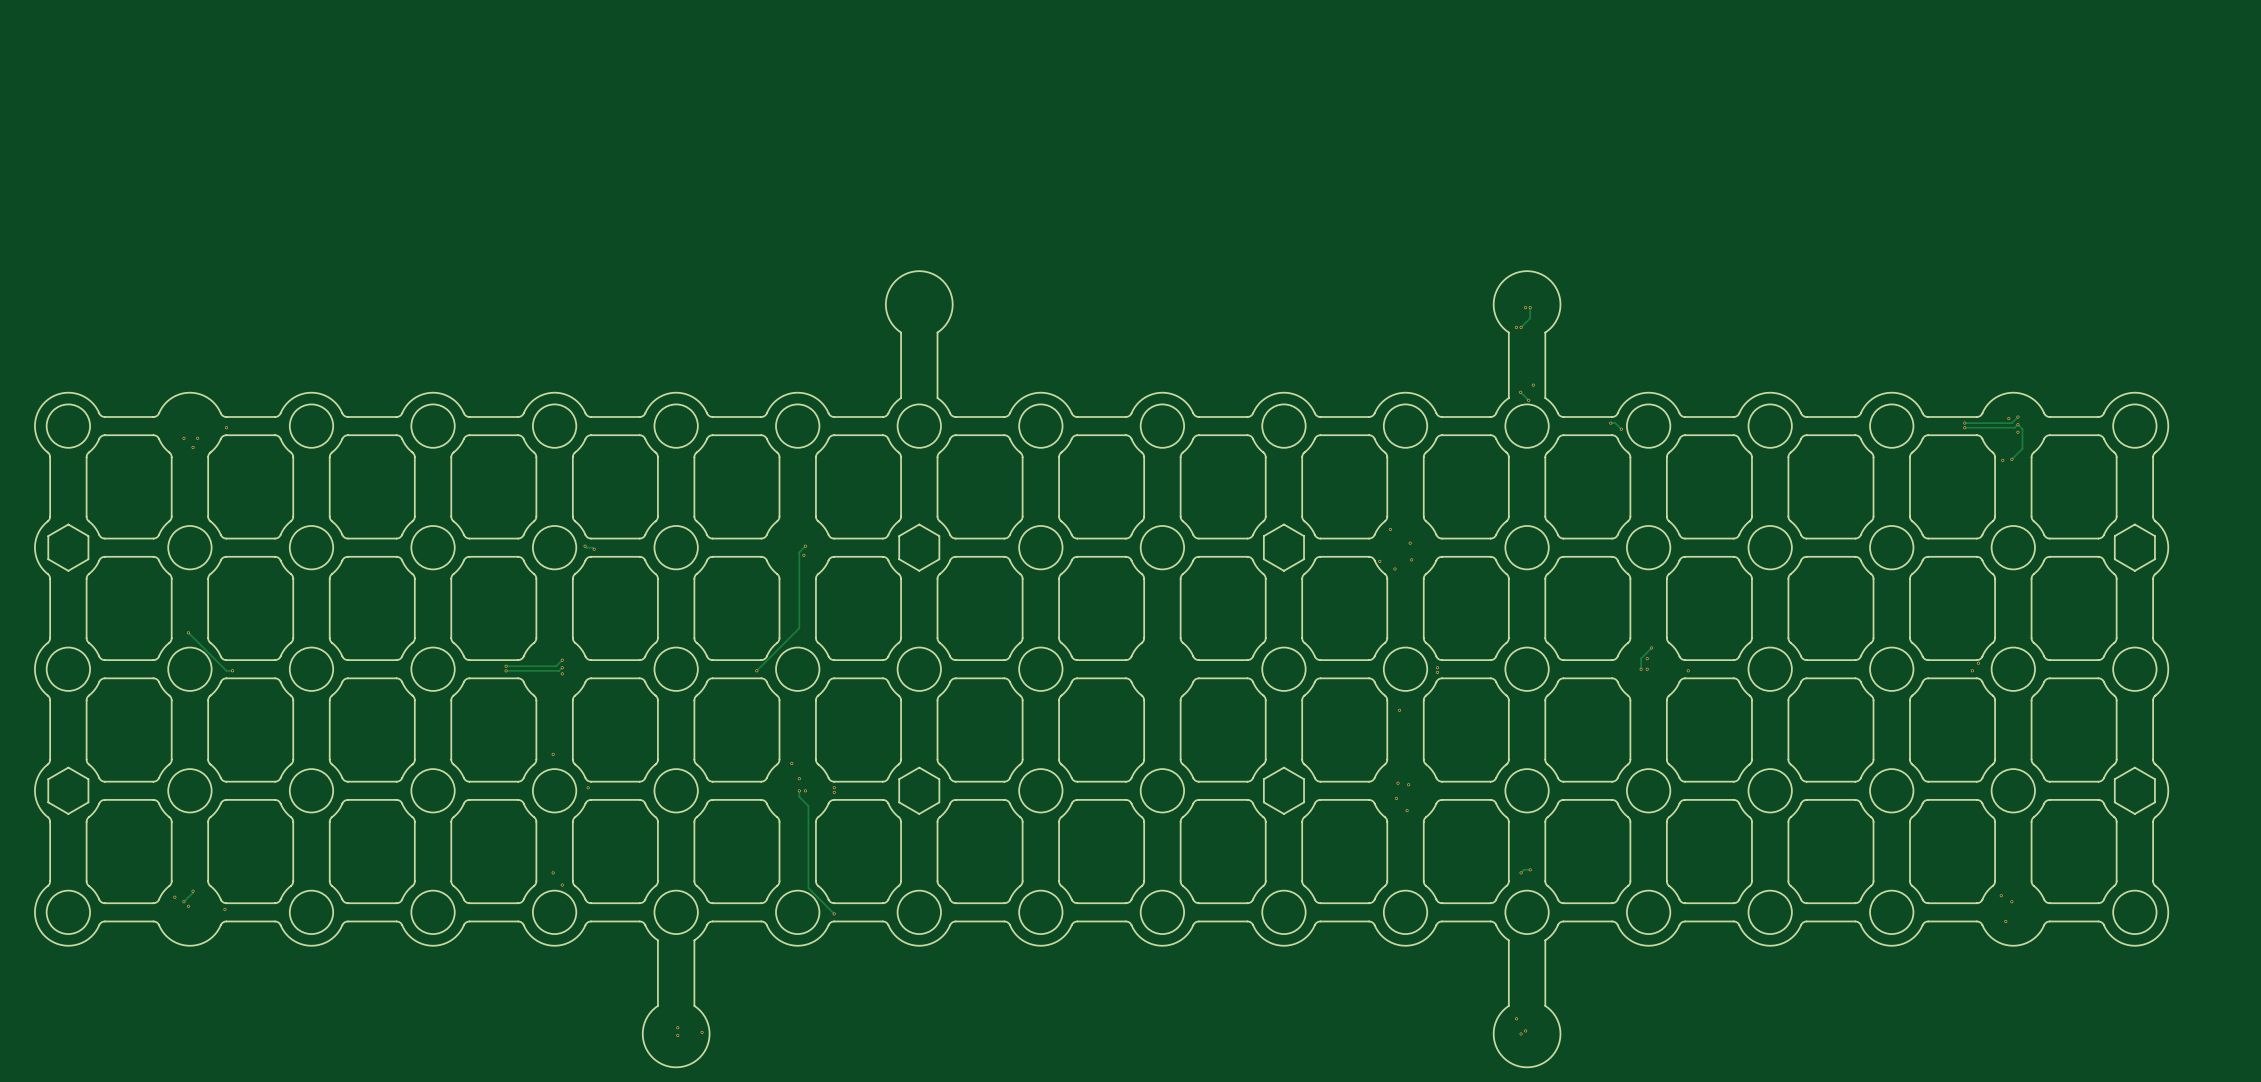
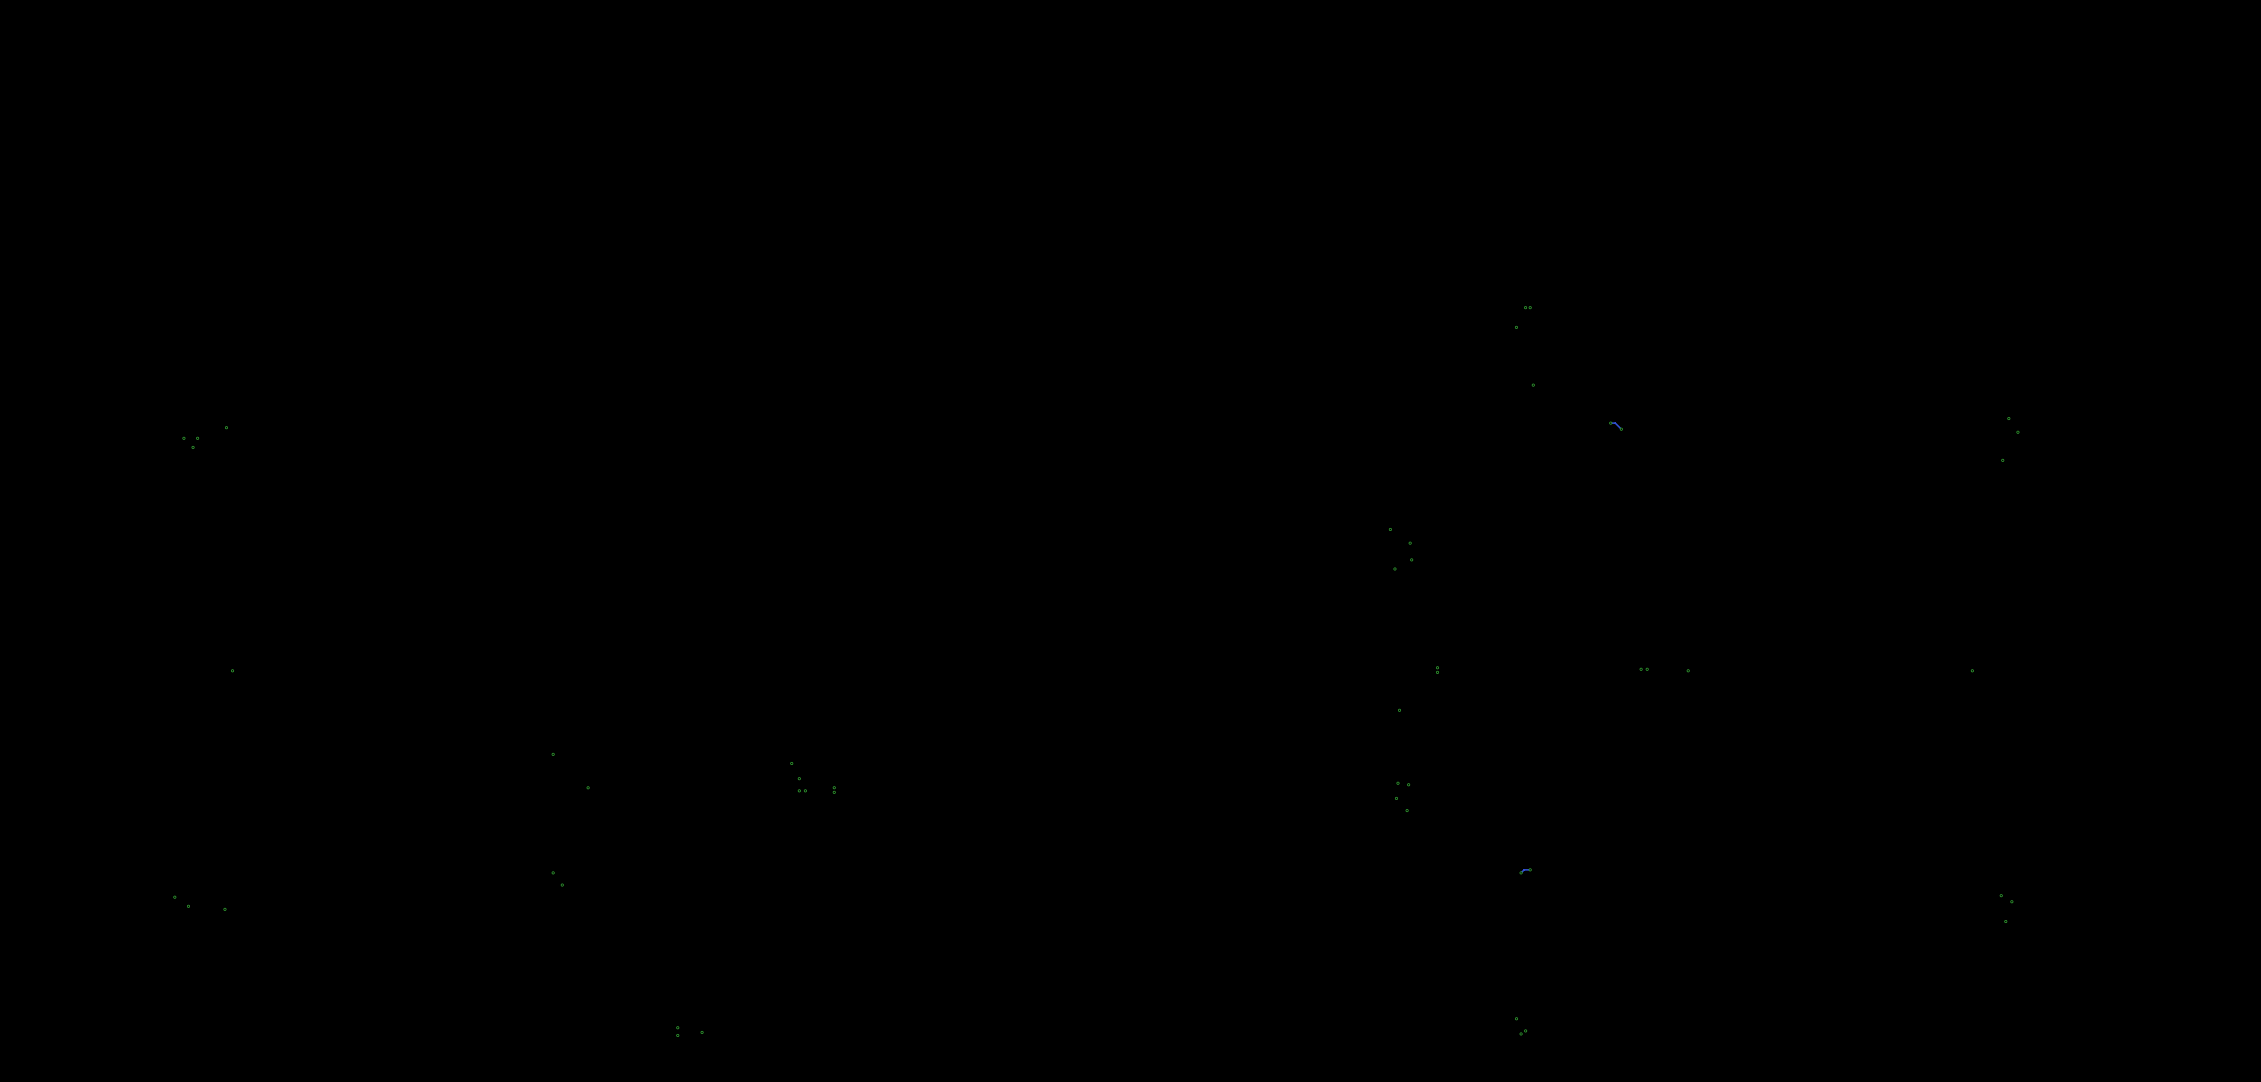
track: (1530, 307) (1530, 318) (1521, 327) -> none
via: (1521, 327) -> none
board edge: (1545, 332) (1545, 398) (1562, 416) (1613, 416) (1628, 399) (1638, 394) (1648, 392) (1659, 394) (1668, 399) (1680, 415) (1685, 416) (1735, 416) (1750, 399) (1759, 394) (1770, 392) (1780, 394) (1790, 399) (1802, 415) (1806, 416) (1856, 416) (1871, 399) (1881, 394) (1891, 392) (1902, 394) (1911, 399) (1923, 415) (1928, 416) (1978, 416) (1993, 399) (2009, 392) (2020, 393) (2030, 397) (2049, 416) (2099, 416) (2114, 399) (2131, 392) (2145, 394) (2157, 401) (2165, 413) (2168, 427) (2164, 441) (2153, 456) (2153, 517) (2164, 531) (2168, 547) (2164, 563) (2153, 578) (2153, 638) (2164, 653) (2168, 669) (2164, 685) (2153, 699) (2153, 759) (2164, 774) (2168, 790) (2164, 806) (2153, 821) (2153, 881) (2164, 896) (2168, 910) (2165, 924) (2157, 936) (2145, 943) (2131, 945) (2114, 939) (2099, 921) (2049, 921) (2030, 941) (2020, 945) (2009, 945) (1993, 939) (1978, 921) (1928, 921) (1923, 923) (1911, 939) (1902, 944) (1891, 945) (1881, 944) (1871, 939) (1856, 921) (1806, 921) (1802, 923) (1790, 939) (1780, 944) (1770, 945) (1759, 944) (1750, 939) (1735, 921) (1685, 921) (1680, 923) (1668, 939) (1659, 944) (1648, 945) (1638, 944) (1628, 939) (1613, 921) (1562, 921) (1545, 940) (1545, 1005) (1557, 1019) (1560, 1030) (1559, 1041) (1555, 1051) (1547, 1060) (1538, 1065) (1527, 1067) (1516, 1065) (1506, 1060) (1498, 1051) (1494, 1041) (1493, 1030) (1496, 1019) (1508, 1005) (1508, 940) (1492, 921) (1440, 921) (1425, 939) (1416, 944) (1405, 945) (1394, 944) (1385, 939) (1370, 921) (1319, 921) (1315, 923) (1303, 939) (1294, 944) (1283, 945) (1273, 944) (1263, 939) (1248, 921) (1198, 921) (1194, 923) (1182, 939) (1172, 944) (1162, 945) (1151, 944) (1142, 939) (1127, 921) (1077, 921) (1072, 923) (1060, 939) (1051, 944) (1040, 945) (1030, 944) (1020, 939) (1005, 921) (955, 921) (951, 923) (939, 939) (929, 944) (919, 945) (908, 944) (899, 939) (884, 921) (834, 921) (829, 923) (817, 939) (808, 944) (797, 945) (787, 944) (777, 939) (762, 921) (711, 921) (694, 940) (694, 1005) (706, 1019) (709, 1030) (708, 1041) (704, 1051) (696, 1060) (687, 1065) (676, 1067) (665, 1065) (655, 1060) (647, 1051) (643, 1041) (642, 1030) (645, 1019) (657, 1005) (657, 940) (641, 921) (589, 921) (574, 939) (565, 944) (554, 945) (544, 944) (534, 939) (522, 923) (518, 921) (468, 921) (453, 939) (443, 944) (433, 945) (422, 944) (413, 939) (401, 923) (396, 921) (346, 921) (331, 939) (322, 944) (311, 945) (300, 944) (291, 939) (279, 923) (275, 921) (224, 921) (209, 939) (200, 944) (189, 945) (179, 944) (169, 939) (157, 923) (154, 921) (103, 921) (88, 939) (78, 944) (68, 945) (51, 940) (42, 934) (37, 924) (34, 914) (36, 903) (40, 893) (50, 881) (50, 821) (39, 806) (34, 790) (39, 774) (50, 760) (50, 700) (39, 685) (34, 669) (39, 653) (50, 638) (50, 578) (39, 563) (34, 547) (39, 531) (50, 517) (50, 457) (38, 441) (34, 424) (40, 407) (48, 399) (57, 394) (71, 392) (82, 395) (91, 401) (100, 415) (104, 416) (154, 416) (169, 399) (179, 394) (189, 392) (200, 394) (209, 399) (221, 415) (225, 416) (276, 416) (291, 399) (300, 394) (311, 392) (322, 394) (331, 399) (346, 416) (397, 416) (401, 415) (413, 399) (422, 394) (433, 392) (443, 394) (453, 399) (468, 416) (518, 416) (522, 415) (534, 399) (544, 394) (554, 392) (565, 394) (574, 399) (589, 416) (639, 416) (644, 415) (656, 399) (665, 394) (676, 392) (686, 394) (696, 399) (711, 416) (761, 416) (765, 415) (777, 399) (787, 394) (797, 392) (808, 394) (817, 399) (832, 416) (883, 416) (901, 398) (901, 332) (892, 325) (887, 315) (886, 296) (891, 286) (898, 278) (908, 272) (919, 271) (930, 272) (940, 278) (947, 286) (951, 296) (950, 315) (945, 325) (937, 332) (937, 398) (955, 416) (1005, 416) (1020, 399) (1030, 394) (1040, 392) (1051, 394) (1060, 399) (1075, 416) (1126, 416) (1130, 415) (1142, 399) (1151, 394) (1162, 392) (1172, 394) (1182, 399) (1197, 416) (1248, 416) (1251, 415) (1263, 399) (1273, 394) (1283, 392) (1294, 394) (1303, 399) (1319, 416) (1369, 416) (1373, 415) (1385, 399) (1394, 394) (1405, 392) (1416, 394) (1425, 399) (1440, 416) (1491, 416) (1508, 398) (1508, 332) (1496, 318) (1493, 304) (1497, 289) (1509, 276) (1519, 271) (1534, 271) (1547, 278) (1555, 286) (1559, 296) (1559, 311) (1555, 321) (1545, 332) -> none
track: (1520, 392) (1528, 400) -> none
via: (1520, 392) -> none
via: (1528, 400) -> none
round board edge: [46, 404, 91, 448] -> none
round board edge: [289, 404, 334, 448] -> none
round board edge: [411, 404, 455, 448] -> none
round board edge: [532, 404, 577, 448] -> none
round board edge: [654, 404, 699, 448] -> none
round board edge: [775, 404, 820, 448] -> none
round board edge: [897, 404, 942, 448] -> none
round board edge: [1018, 404, 1063, 448] -> none
round board edge: [1140, 404, 1185, 448] -> none
round board edge: [1262, 404, 1306, 448] -> none
round board edge: [1383, 404, 1428, 448] -> none
round board edge: [1505, 404, 1549, 448] -> none
round board edge: [1626, 404, 1671, 448] -> none
round board edge: [1748, 404, 1793, 448] -> none
round board edge: [1869, 404, 1914, 448] -> none
round board edge: [2113, 404, 2157, 448] -> none
track: (2017, 417) (2011, 423) (1964, 423) -> none
via: (2017, 417) -> none
via: (1964, 423) -> none
via: (2017, 424) -> none
track: (1964, 427) (2014, 427) (2017, 424) (2022, 429) (2022, 448) (2011, 459) -> none
via: (1964, 427) -> none
board edge: (153, 435) (103, 435) (87, 454) (86, 517) (102, 537) (154, 538) (171, 519) (171, 455) (157, 437) (153, 435) -> none
board edge: (275, 435) (224, 435) (208, 454) (208, 517) (223, 537) (276, 538) (292, 519) (293, 455) (279, 437) (275, 435) -> none
board edge: (396, 435) (346, 435) (330, 454) (329, 517) (345, 537) (397, 538) (414, 519) (414, 455) (401, 437) (396, 435) -> none
board edge: (518, 435) (468, 435) (451, 454) (451, 517) (466, 537) (519, 538) (535, 519) (536, 455) (522, 437) (518, 435) -> none
board edge: (639, 435) (589, 435) (573, 454) (572, 517) (588, 537) (641, 538) (657, 519) (657, 455) (644, 437) (639, 435) -> none
board edge: (761, 435) (711, 435) (695, 454) (694, 517) (709, 537) (762, 538) (778, 519) (779, 455) (765, 437) (761, 435) -> none
board edge: (882, 435) (832, 435) (816, 454) (816, 517) (831, 537) (884, 538) (900, 519) (900, 455) (887, 437) (882, 435) -> none
board edge: (1004, 435) (954, 435) (938, 454) (937, 517) (952, 537) (1005, 538) (1021, 519) (1022, 455) (1008, 437) (1004, 435) -> none
board edge: (1125, 435) (1075, 435) (1059, 454) (1059, 517) (1074, 537) (1127, 538) (1143, 519) (1144, 455) (1130, 437) (1125, 435) -> none
board edge: (1247, 435) (1197, 435) (1181, 454) (1180, 517) (1196, 537) (1248, 538) (1265, 519) (1265, 455) (1251, 437) (1247, 435) -> none
board edge: (1369, 435) (1319, 435) (1302, 454) (1302, 517) (1317, 537) (1370, 538) (1386, 519) (1387, 455) (1373, 437) (1369, 435) -> none
board edge: (1490, 435) (1440, 435) (1424, 454) (1423, 517) (1439, 537) (1492, 538) (1508, 519) (1508, 455) (1495, 437) (1490, 435) -> none
board edge: (1612, 435) (1562, 435) (1545, 454) (1545, 517) (1560, 537) (1613, 538) (1629, 519) (1630, 455) (1616, 437) (1612, 435) -> none
board edge: (1733, 435) (1683, 435) (1667, 454) (1667, 517) (1682, 537) (1735, 538) (1751, 519) (1751, 455) (1738, 437) (1733, 435) -> none
board edge: (1855, 435) (1805, 435) (1789, 454) (1788, 517) (1803, 537) (1856, 538) (1872, 519) (1873, 455) (1859, 437) (1855, 435) -> none
board edge: (1976, 435) (1926, 435) (1910, 454) (1910, 517) (1925, 537) (1978, 538) (1994, 519) (1994, 455) (1981, 437) (1976, 435) -> none
board edge: (2098, 435) (2048, 435) (2032, 454) (2031, 517) (2047, 537) (2099, 538) (2116, 519) (2116, 455) (2102, 437) (2098, 435) -> none
via: (2011, 459) -> none
board edge: (68, 524) (88, 536) (88, 559) (68, 570) (48, 559) (48, 536) (68, 524) -> none
board edge: (919, 524) (899, 536) (899, 559) (919, 570) (939, 559) (939, 536) (919, 524) -> none
board edge: (1283, 524) (1304, 536) (1304, 559) (1283, 570) (1263, 559) (1263, 536) (1283, 524) -> none
board edge: (2134, 524) (2154, 536) (2154, 559) (2134, 570) (2114, 559) (2114, 536) (2134, 524) -> none
round board edge: [168, 525, 212, 570] -> none
round board edge: [289, 525, 334, 570] -> none
round board edge: [411, 525, 455, 570] -> none
round board edge: [532, 525, 577, 570] -> none
round board edge: [654, 525, 699, 570] -> none
round board edge: [1018, 525, 1063, 570] -> none
round board edge: [1140, 525, 1185, 570] -> none
round board edge: [1505, 525, 1549, 570] -> none
round board edge: [1626, 525, 1671, 570] -> none
round board edge: [1748, 525, 1793, 570] -> none
round board edge: [1869, 525, 1914, 570] -> none
round board edge: [1991, 525, 2036, 570] -> none
track: (585, 546) (594, 549) -> none
via: (585, 546) -> none
track: (805, 546) (799, 552) (799, 628) (756, 670) -> none
via: (805, 546) -> none
via: (594, 549) -> none
via: (803, 555) -> none
board edge: (153, 556) (103, 556) (87, 576) (86, 639) (102, 659) (154, 659) (171, 640) (171, 577) (157, 558) (153, 556) -> none
board edge: (275, 556) (224, 556) (208, 576) (208, 639) (223, 659) (276, 659) (292, 640) (293, 577) (279, 558) (275, 556) -> none
board edge: (396, 556) (346, 556) (330, 576) (329, 639) (345, 659) (397, 659) (414, 640) (414, 577) (401, 558) (396, 556) -> none
board edge: (518, 556) (468, 556) (451, 576) (451, 639) (466, 659) (519, 659) (535, 640) (536, 577) (522, 558) (518, 556) -> none
board edge: (639, 556) (589, 556) (573, 576) (572, 639) (588, 659) (641, 659) (657, 640) (657, 577) (644, 558) (639, 556) -> none
board edge: (761, 556) (711, 556) (695, 576) (694, 639) (709, 659) (762, 659) (778, 640) (779, 577) (765, 558) (761, 556) -> none
board edge: (882, 556) (832, 556) (816, 576) (816, 639) (831, 659) (884, 659) (900, 640) (900, 577) (887, 558) (882, 556) -> none
board edge: (1004, 556) (954, 556) (938, 576) (937, 639) (952, 659) (1005, 659) (1021, 640) (1022, 577) (1008, 558) (1004, 556) -> none
board edge: (1125, 556) (1075, 556) (1059, 576) (1059, 639) (1074, 659) (1127, 659) (1143, 640) (1144, 577) (1130, 558) (1125, 556) -> none
board edge: (1247, 556) (1197, 556) (1181, 576) (1180, 639) (1196, 659) (1248, 659) (1265, 640) (1265, 577) (1251, 558) (1247, 556) -> none
board edge: (1369, 556) (1319, 556) (1302, 576) (1302, 639) (1317, 659) (1370, 659) (1386, 640) (1387, 577) (1373, 558) (1369, 556) -> none
board edge: (1490, 556) (1440, 556) (1424, 576) (1423, 639) (1439, 659) (1492, 659) (1508, 640) (1508, 577) (1495, 558) (1490, 556) -> none
board edge: (1612, 556) (1562, 556) (1545, 576) (1545, 639) (1560, 659) (1613, 659) (1629, 640) (1630, 577) (1616, 558) (1612, 556) -> none
board edge: (1733, 556) (1683, 556) (1667, 576) (1667, 639) (1682, 659) (1735, 659) (1751, 640) (1751, 577) (1738, 558) (1733, 556) -> none
board edge: (1855, 556) (1805, 556) (1789, 576) (1788, 639) (1803, 659) (1856, 659) (1872, 640) (1873, 577) (1859, 558) (1855, 556) -> none
board edge: (1976, 556) (1926, 556) (1910, 576) (1910, 639) (1925, 659) (1978, 659) (1994, 640) (1994, 577) (1981, 558) (1976, 556) -> none
board edge: (2098, 556) (2048, 556) (2032, 576) (2031, 639) (2047, 659) (2099, 659) (2116, 640) (2116, 577) (2102, 558) (2098, 556) -> none
via: (1379, 561) -> none
track: (188, 632) (226, 670) (232, 670) -> none
via: (188, 632) -> none
round board edge: [46, 647, 91, 692] -> none
round board edge: [168, 647, 212, 692] -> none
round board edge: [289, 647, 334, 692] -> none
round board edge: [411, 647, 455, 692] -> none
round board edge: [654, 647, 699, 692] -> none
round board edge: [775, 647, 820, 692] -> none
round board edge: [897, 647, 942, 692] -> none
round board edge: [1018, 647, 1063, 692] -> none
round board edge: [1262, 647, 1306, 692] -> none
round board edge: [1383, 647, 1428, 692] -> none
round board edge: [1505, 647, 1549, 692] -> none
track: (1651, 647) (1641, 658) (1641, 669) -> none
via: (1651, 647) -> none
round board edge: [1748, 647, 1793, 692] -> none
round board edge: [1869, 647, 1914, 692] -> none
round board edge: [1991, 647, 2036, 692] -> none
round board edge: [2113, 647, 2157, 692] -> none
via: (1647, 658) -> none
track: (562, 660) (556, 666) (506, 666) -> none
via: (562, 660) -> none
via: (1978, 663) -> none
via: (506, 666) -> none
track: (562, 667) (559, 670) (506, 670) -> none
via: (562, 667) -> none
via: (506, 670) -> none
via: (756, 670) -> none
via: (562, 673) -> none
board edge: (153, 678) (103, 678) (87, 697) (86, 761) (102, 781) (154, 781) (171, 762) (171, 699) (157, 680) (153, 678) -> none
board edge: (275, 678) (224, 678) (208, 697) (208, 761) (223, 781) (276, 781) (292, 762) (293, 699) (279, 680) (275, 678) -> none
board edge: (396, 678) (346, 678) (330, 697) (329, 761) (345, 781) (397, 781) (414, 762) (414, 699) (401, 680) (396, 678) -> none
board edge: (518, 678) (468, 678) (451, 697) (451, 761) (466, 781) (519, 781) (535, 762) (536, 699) (522, 680) (518, 678) -> none
board edge: (639, 678) (589, 678) (573, 697) (572, 761) (588, 781) (641, 781) (657, 762) (657, 699) (644, 680) (639, 678) -> none
board edge: (761, 678) (711, 678) (695, 697) (694, 761) (709, 781) (762, 781) (778, 762) (779, 699) (765, 680) (761, 678) -> none
board edge: (882, 678) (832, 678) (816, 697) (816, 761) (831, 781) (884, 781) (900, 762) (900, 699) (887, 680) (882, 678) -> none
board edge: (1004, 678) (954, 678) (938, 697) (937, 761) (952, 781) (1005, 781) (1021, 762) (1022, 699) (1008, 680) (1004, 678) -> none
board edge: (1125, 678) (1075, 678) (1059, 697) (1059, 761) (1074, 781) (1127, 781) (1143, 762) (1144, 699) (1130, 680) (1125, 678) -> none
board edge: (1247, 678) (1197, 678) (1181, 697) (1180, 761) (1196, 781) (1248, 781) (1265, 762) (1265, 699) (1251, 680) (1247, 678) -> none
board edge: (1369, 678) (1319, 678) (1302, 697) (1302, 761) (1317, 781) (1370, 781) (1386, 762) (1387, 699) (1373, 680) (1369, 678) -> none
board edge: (1490, 678) (1440, 678) (1424, 697) (1423, 761) (1439, 781) (1492, 781) (1508, 762) (1508, 699) (1495, 680) (1490, 678) -> none
board edge: (1612, 678) (1562, 678) (1545, 697) (1545, 761) (1560, 781) (1613, 781) (1629, 762) (1630, 699) (1616, 680) (1612, 678) -> none
board edge: (1733, 678) (1683, 678) (1667, 697) (1667, 761) (1682, 781) (1735, 781) (1751, 762) (1751, 699) (1738, 680) (1733, 678) -> none
board edge: (1855, 678) (1805, 678) (1789, 697) (1788, 761) (1803, 781) (1856, 781) (1872, 762) (1873, 699) (1859, 680) (1855, 678) -> none
board edge: (1976, 678) (1926, 678) (1910, 697) (1910, 761) (1925, 781) (1978, 781) (1994, 762) (1994, 699) (1981, 680) (1976, 678) -> none
board edge: (2098, 678) (2048, 678) (2032, 697) (2031, 761) (2047, 781) (2099, 781) (2116, 762) (2116, 699) (2102, 680) (2098, 678) -> none
board edge: (68, 767) (88, 779) (88, 802) (68, 813) (48, 802) (48, 779) (68, 767) -> none
board edge: (919, 767) (899, 779) (899, 802) (919, 813) (939, 802) (939, 779) (919, 767) -> none
board edge: (1283, 767) (1263, 779) (1263, 802) (1283, 813) (1304, 802) (1304, 779) (1283, 767) -> none
board edge: (2134, 767) (2114, 779) (2114, 802) (2134, 813) (2154, 802) (2154, 779) (2134, 767) -> none
round board edge: [168, 768, 212, 813] -> none
round board edge: [289, 768, 334, 813] -> none
round board edge: [411, 768, 455, 813] -> none
round board edge: [532, 768, 577, 813] -> none
round board edge: [654, 768, 699, 813] -> none
round board edge: [1018, 768, 1063, 813] -> none
round board edge: [1140, 768, 1185, 813] -> none
round board edge: [1505, 768, 1549, 813] -> none
round board edge: [1626, 768, 1671, 813] -> none
round board edge: [1748, 768, 1793, 813] -> none
round board edge: [1869, 768, 1914, 813] -> none
round board edge: [1991, 768, 2036, 813] -> none
track: (799, 790) (799, 796) (808, 806) (808, 888) (834, 913) -> none
board edge: (153, 799) (103, 800) (87, 819) (86, 882) (102, 902) (154, 903) (171, 883) (171, 820) (157, 801) (153, 799) -> none
board edge: (275, 799) (224, 800) (208, 819) (208, 882) (223, 902) (276, 903) (292, 883) (293, 820) (279, 801) (275, 799) -> none
board edge: (396, 799) (346, 800) (330, 819) (329, 882) (345, 902) (397, 903) (414, 883) (414, 820) (401, 801) (396, 799) -> none
board edge: (518, 799) (468, 800) (451, 819) (451, 882) (466, 902) (519, 903) (535, 883) (536, 820) (522, 801) (518, 799) -> none
board edge: (639, 799) (589, 800) (573, 819) (572, 882) (588, 902) (641, 903) (657, 883) (657, 820) (644, 801) (639, 799) -> none
board edge: (761, 799) (711, 800) (695, 819) (694, 882) (709, 902) (762, 903) (778, 883) (779, 820) (765, 801) (761, 799) -> none
board edge: (882, 799) (832, 800) (816, 819) (816, 882) (831, 902) (884, 903) (900, 883) (900, 820) (887, 801) (882, 799) -> none
board edge: (1004, 799) (954, 800) (938, 819) (937, 882) (952, 902) (1005, 903) (1021, 883) (1022, 820) (1008, 801) (1004, 799) -> none
board edge: (1125, 799) (1075, 800) (1059, 819) (1059, 882) (1074, 902) (1127, 903) (1143, 883) (1144, 820) (1130, 801) (1125, 799) -> none
board edge: (1247, 799) (1197, 800) (1181, 819) (1180, 882) (1196, 902) (1248, 903) (1265, 883) (1265, 820) (1251, 801) (1247, 799) -> none
board edge: (1369, 799) (1319, 800) (1302, 819) (1302, 882) (1317, 902) (1370, 903) (1386, 883) (1387, 820) (1373, 801) (1369, 799) -> none
board edge: (1490, 799) (1440, 800) (1424, 819) (1423, 882) (1439, 902) (1492, 903) (1508, 883) (1508, 820) (1495, 801) (1490, 799) -> none
board edge: (1612, 799) (1562, 800) (1545, 819) (1545, 882) (1560, 902) (1613, 903) (1629, 883) (1630, 820) (1616, 801) (1612, 799) -> none
board edge: (1733, 799) (1683, 800) (1667, 819) (1667, 882) (1682, 902) (1735, 903) (1751, 883) (1751, 820) (1738, 801) (1733, 799) -> none
board edge: (1855, 799) (1805, 800) (1789, 819) (1788, 882) (1803, 902) (1856, 903) (1872, 883) (1873, 820) (1859, 801) (1855, 799) -> none
board edge: (1976, 799) (1926, 800) (1910, 819) (1910, 882) (1925, 902) (1978, 903) (1994, 883) (1994, 820) (1981, 801) (1976, 799) -> none
board edge: (2098, 799) (2048, 800) (2032, 819) (2031, 882) (2047, 902) (2099, 903) (2116, 883) (2116, 820) (2102, 801) (2098, 799) -> none
round board edge: [46, 890, 91, 935] -> none
round board edge: [289, 890, 334, 935] -> none
round board edge: [411, 890, 455, 935] -> none
round board edge: [532, 890, 577, 935] -> none
round board edge: [654, 890, 699, 935] -> none
round board edge: [775, 890, 820, 935] -> none
round board edge: [897, 890, 942, 935] -> none
round board edge: [1018, 890, 1063, 935] -> none
round board edge: [1140, 890, 1185, 935] -> none
round board edge: [1262, 890, 1306, 935] -> none
round board edge: [1383, 890, 1428, 935] -> none
round board edge: [1505, 890, 1549, 935] -> none
round board edge: [1626, 890, 1671, 935] -> none
round board edge: [1748, 890, 1793, 935] -> none
round board edge: [1869, 890, 1914, 935] -> none
round board edge: [2113, 890, 2157, 935] -> none
track: (193, 891) (183, 901) -> none
via: (193, 891) -> none
via: (183, 901) -> none
via: (834, 913) -> none

